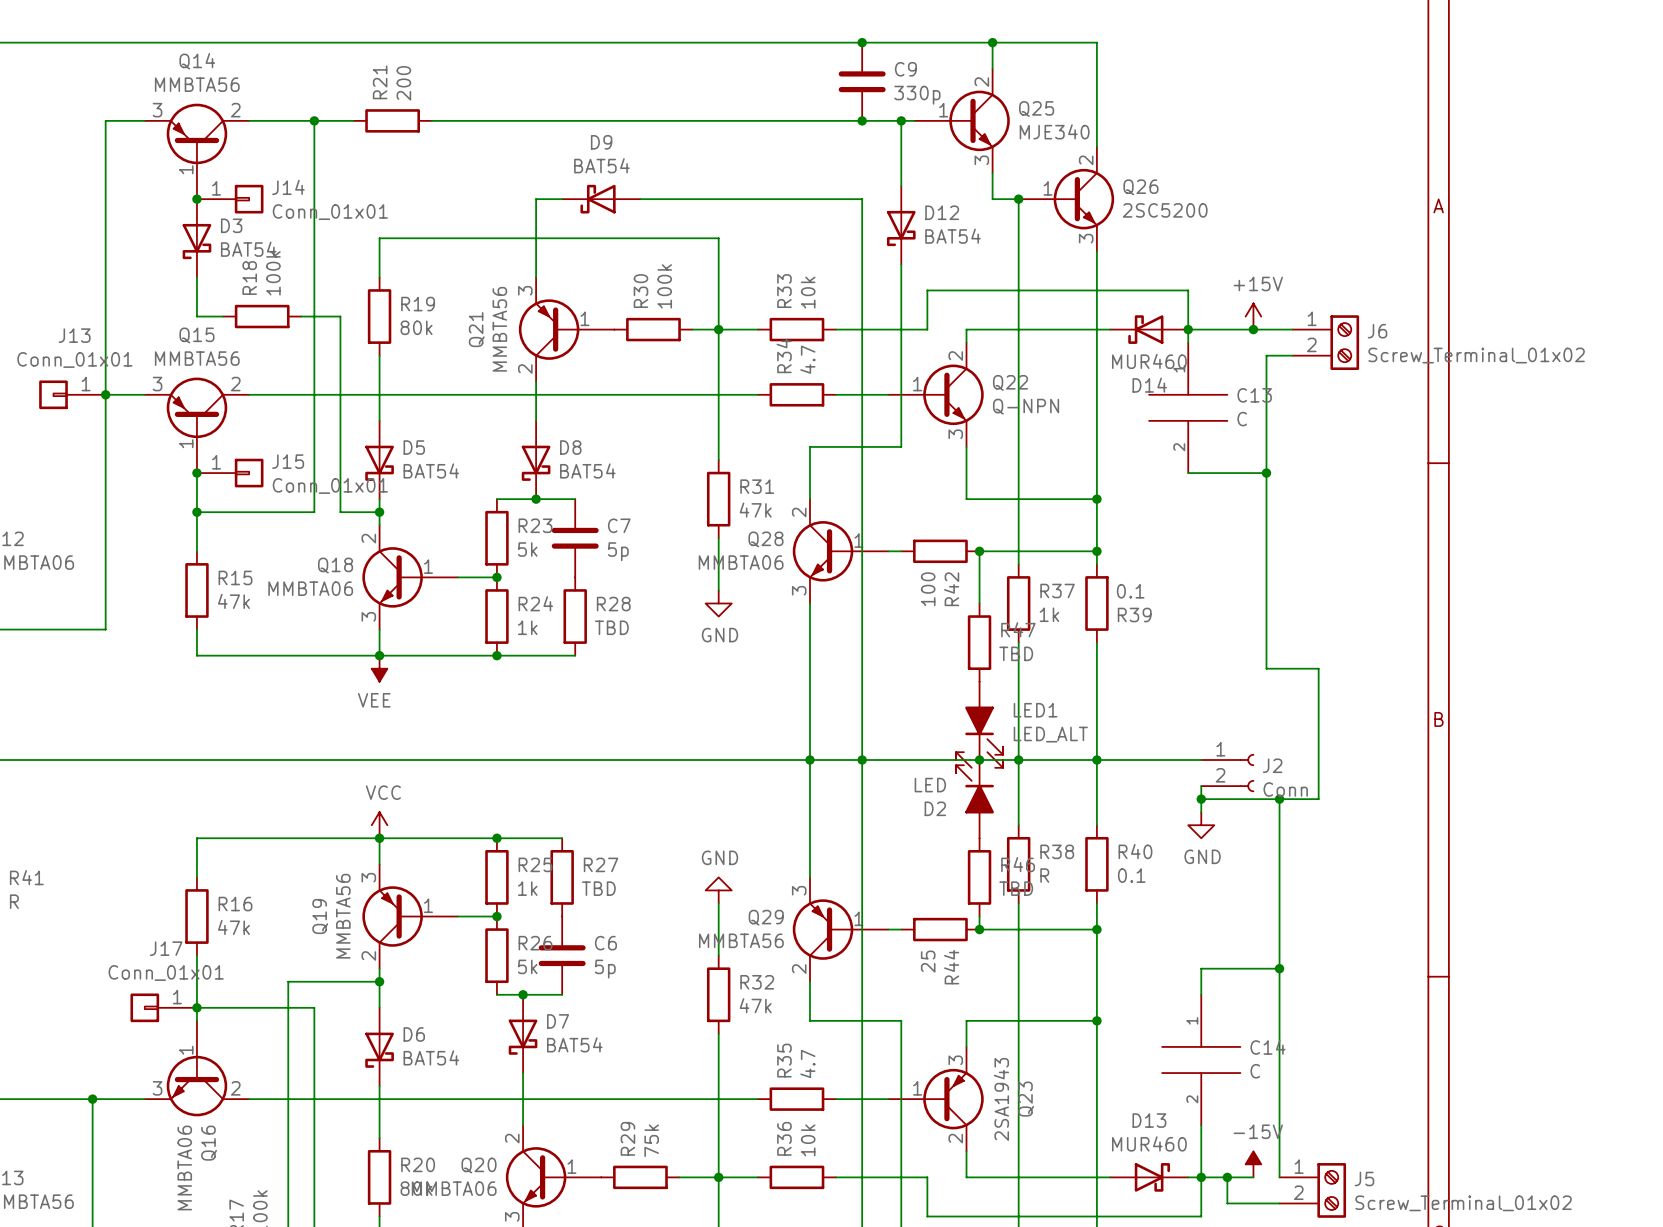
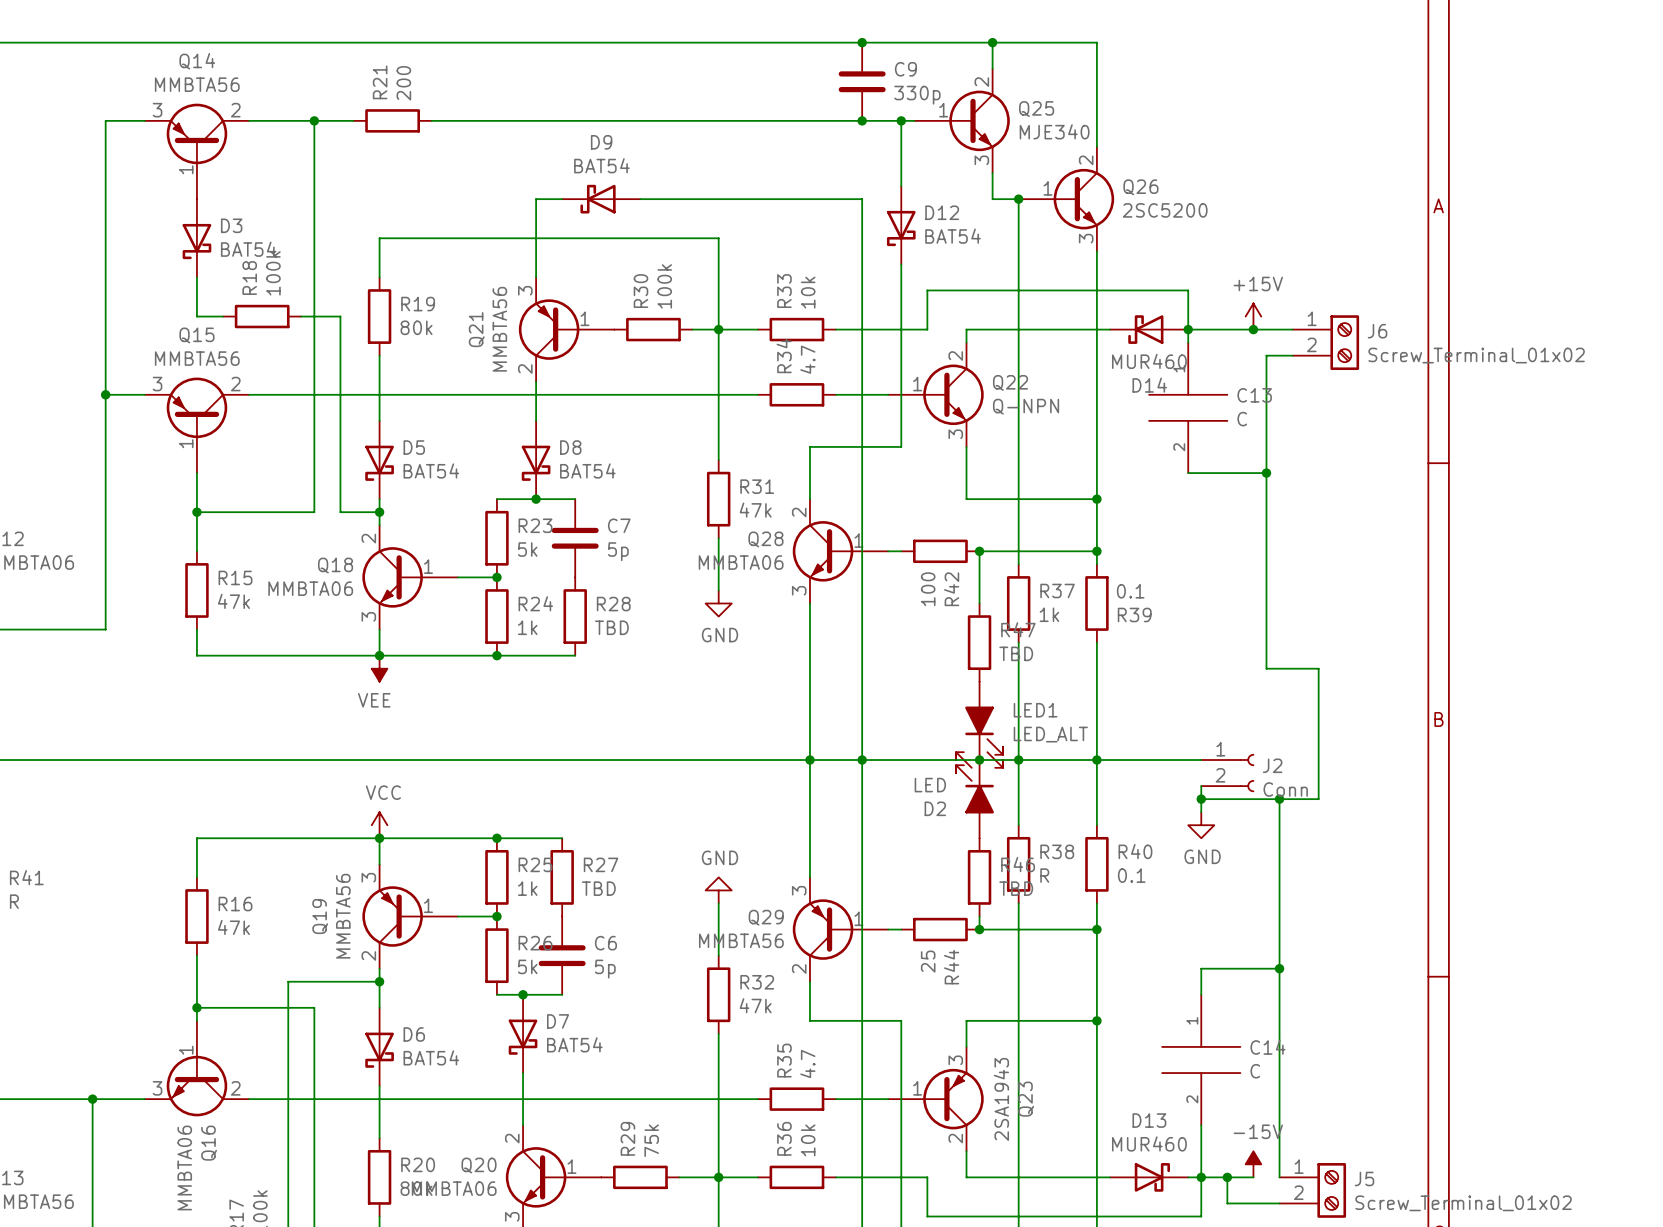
junction: (196, 199) -> none
J14: Conn_01x01 (230, 199) -> none
J13: Conn_01x01 (72, 394) -> none
junction: (196, 473) -> none
J15: Conn_01x01 (230, 473) -> none
J17: Conn_01x01 (163, 1007) -> none

